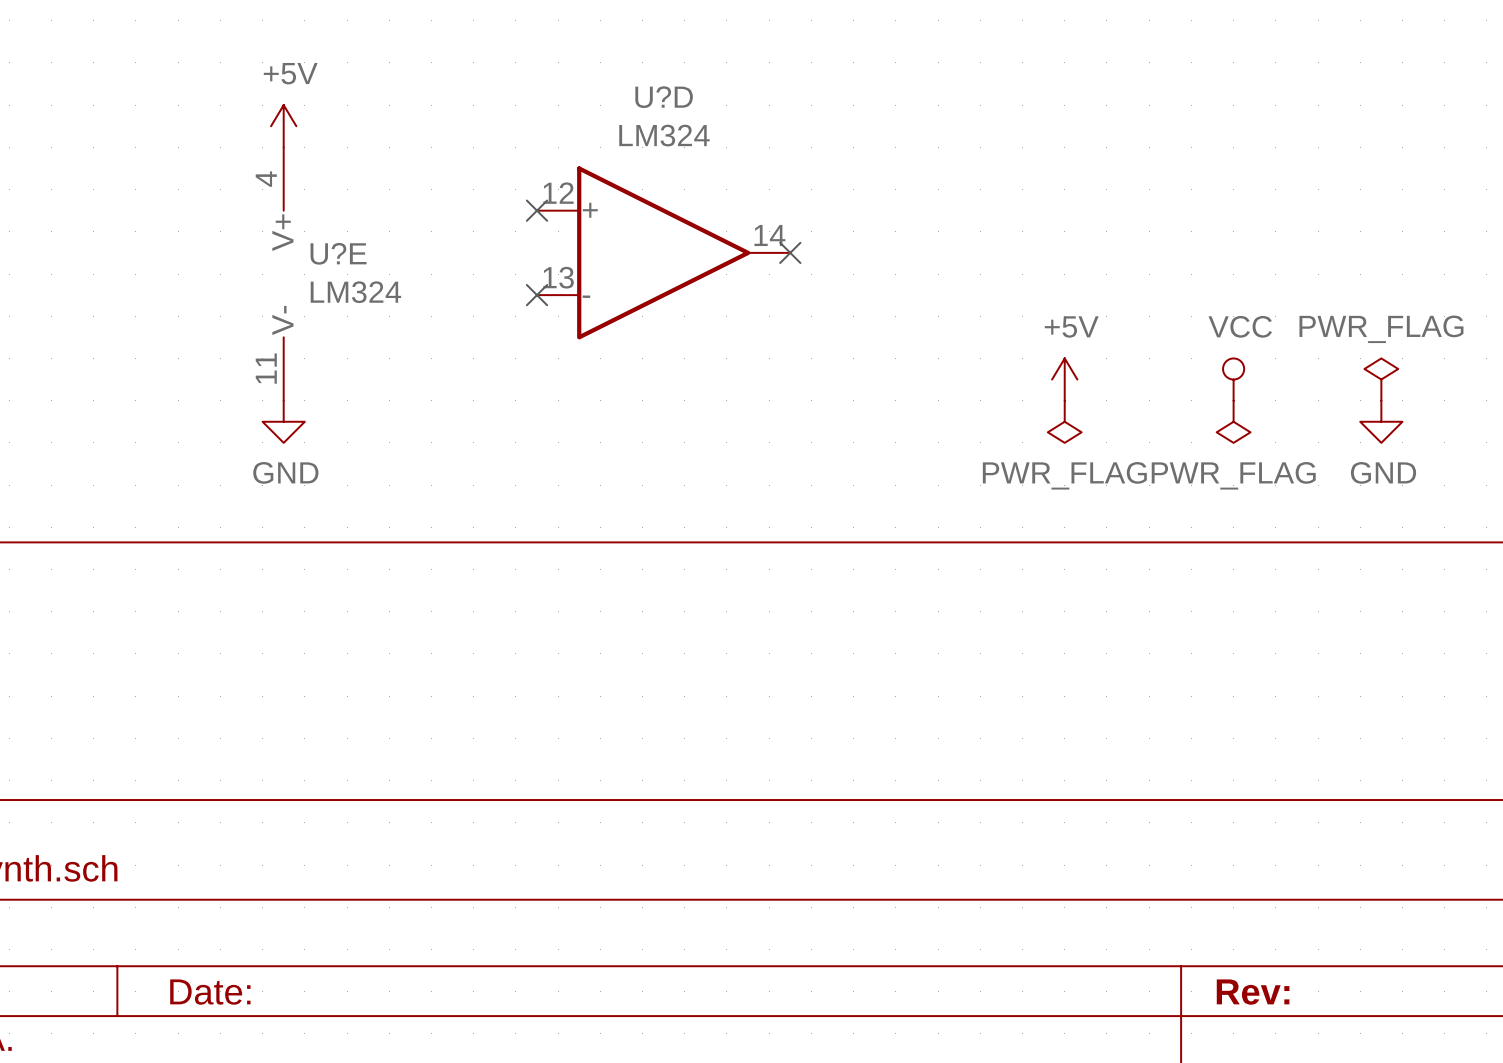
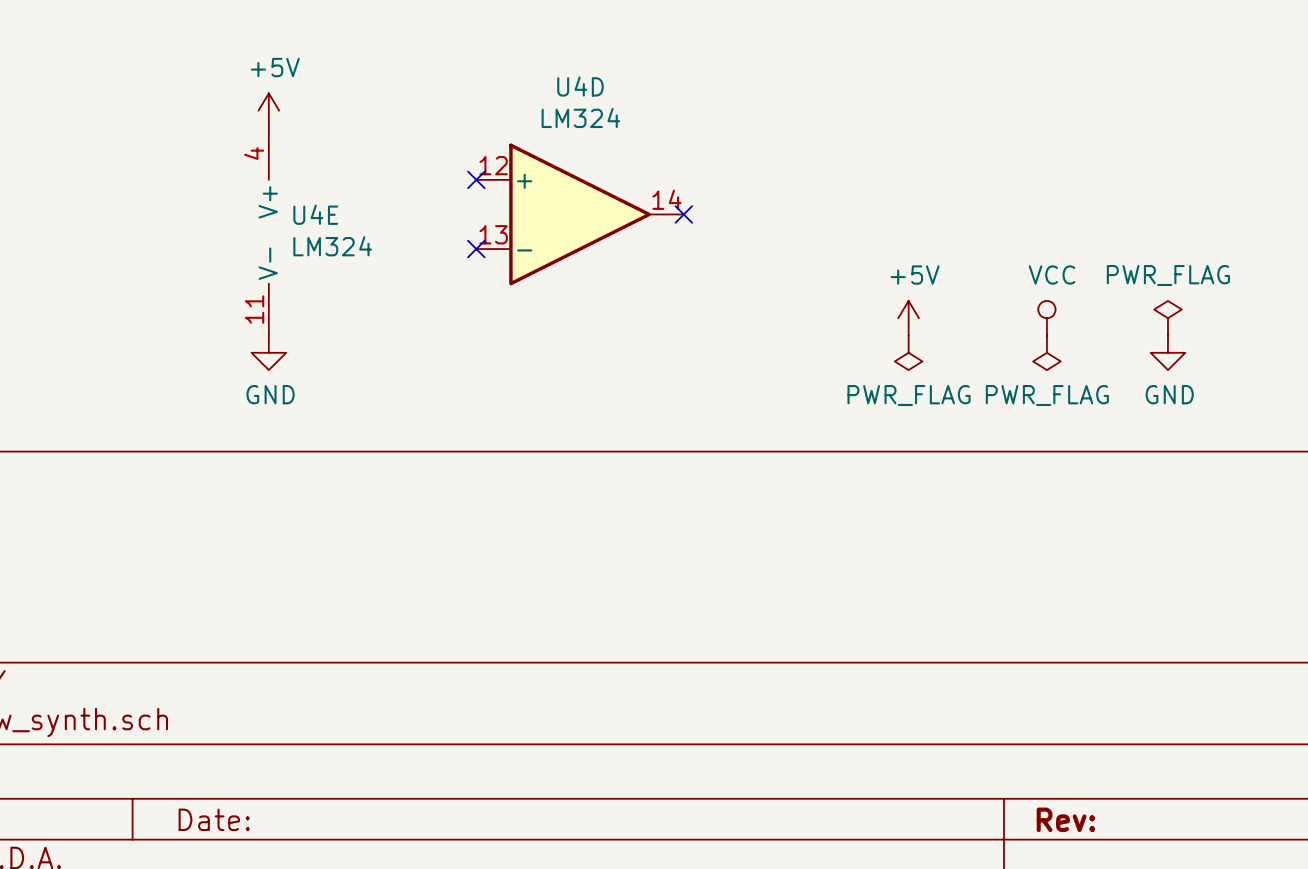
U?D name: U?D (664, 97) -> U4D (580, 86)
U?E name: U?E (338, 253) -> U4E (315, 214)

